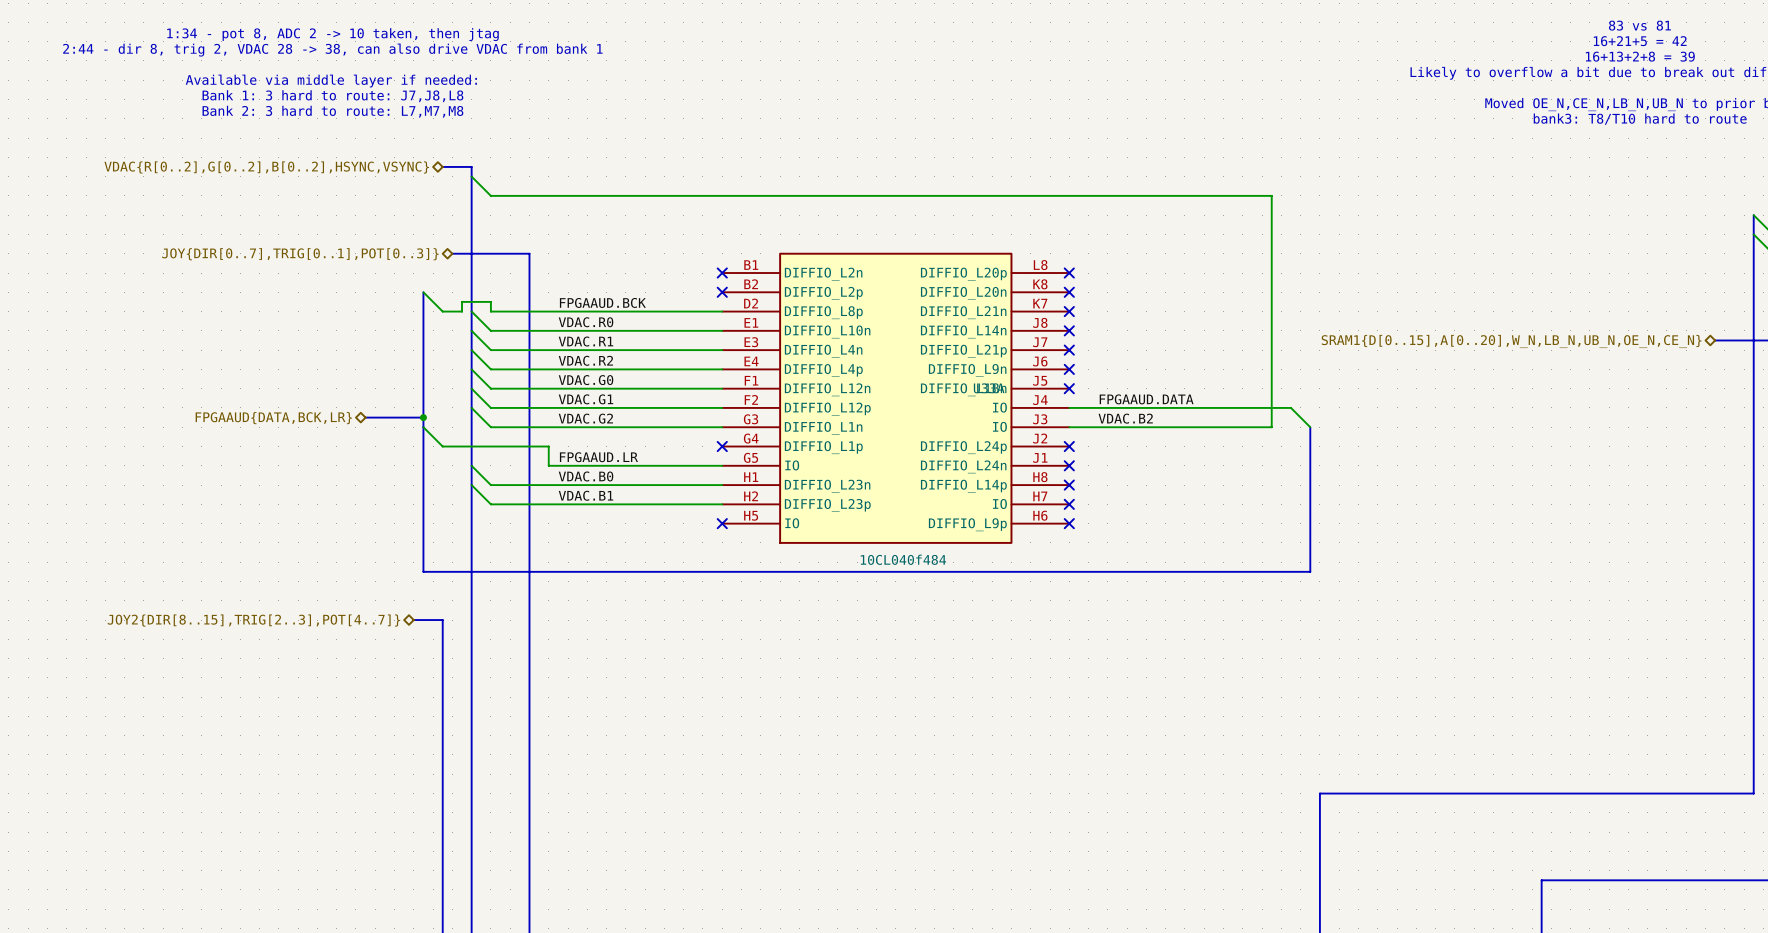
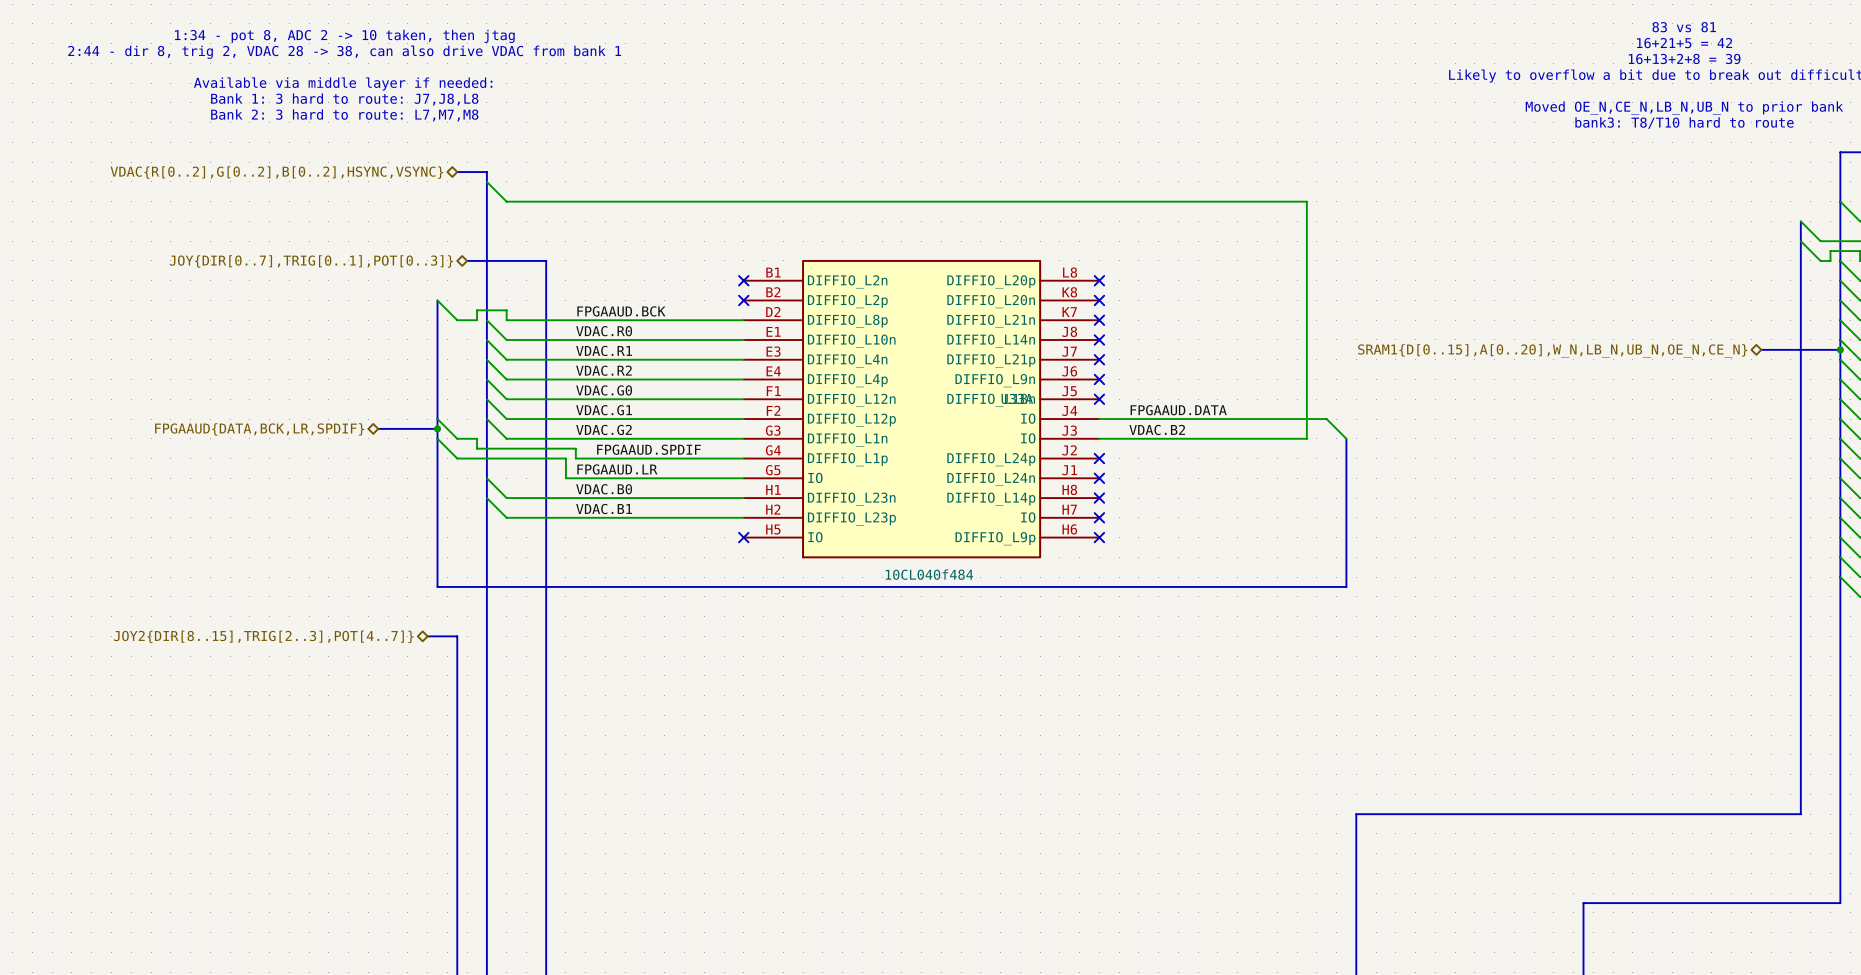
wire: none -> (437, 419) (457, 438) (477, 438) (477, 448) (575, 448) (575, 458) (743, 458)
hierarchical label: FPGAAUD{DATA,BCK,LR} (273, 418) -> FPGAAUD{DATA,BCK,LR,SPDIF} (259, 429)
label: none -> FPGAAUD.SPDIF (648, 449)
no-connect mark: (722, 446) -> none

